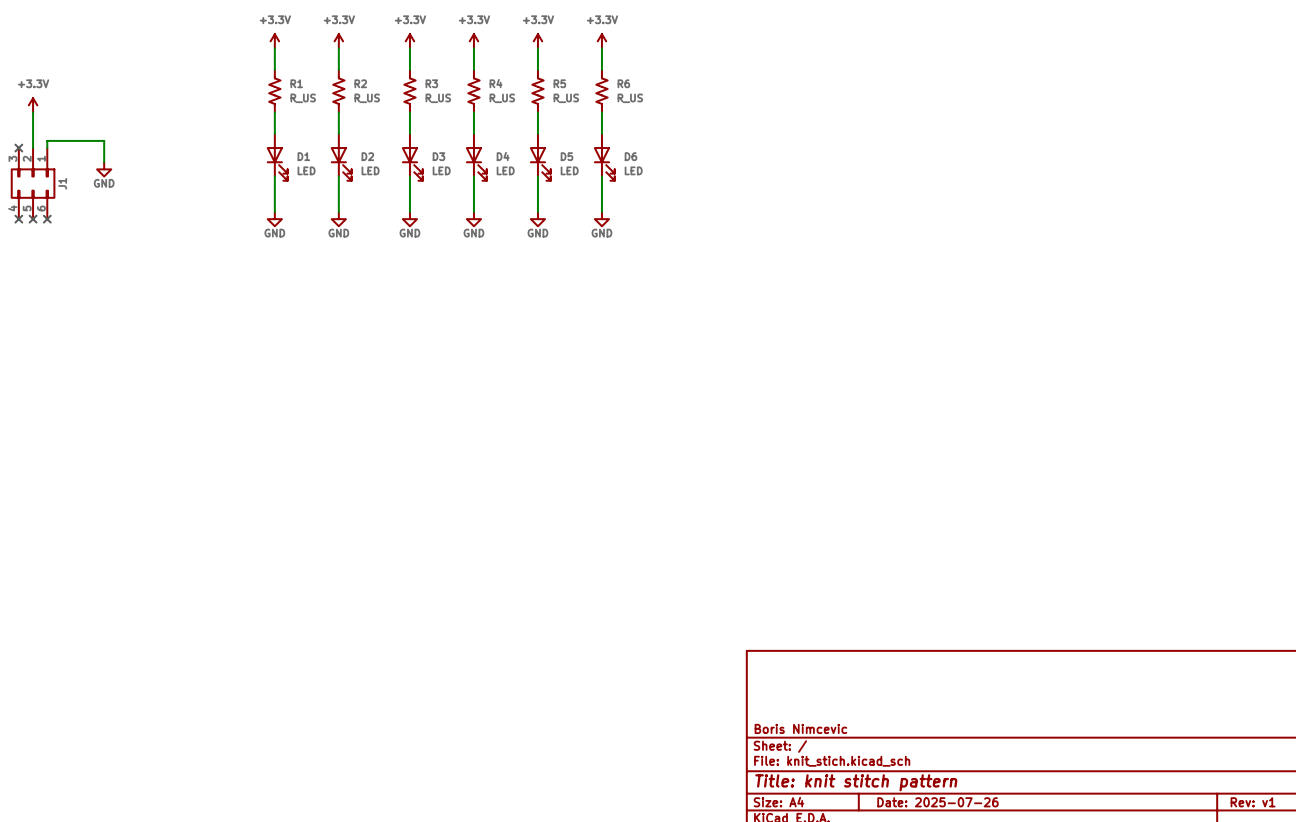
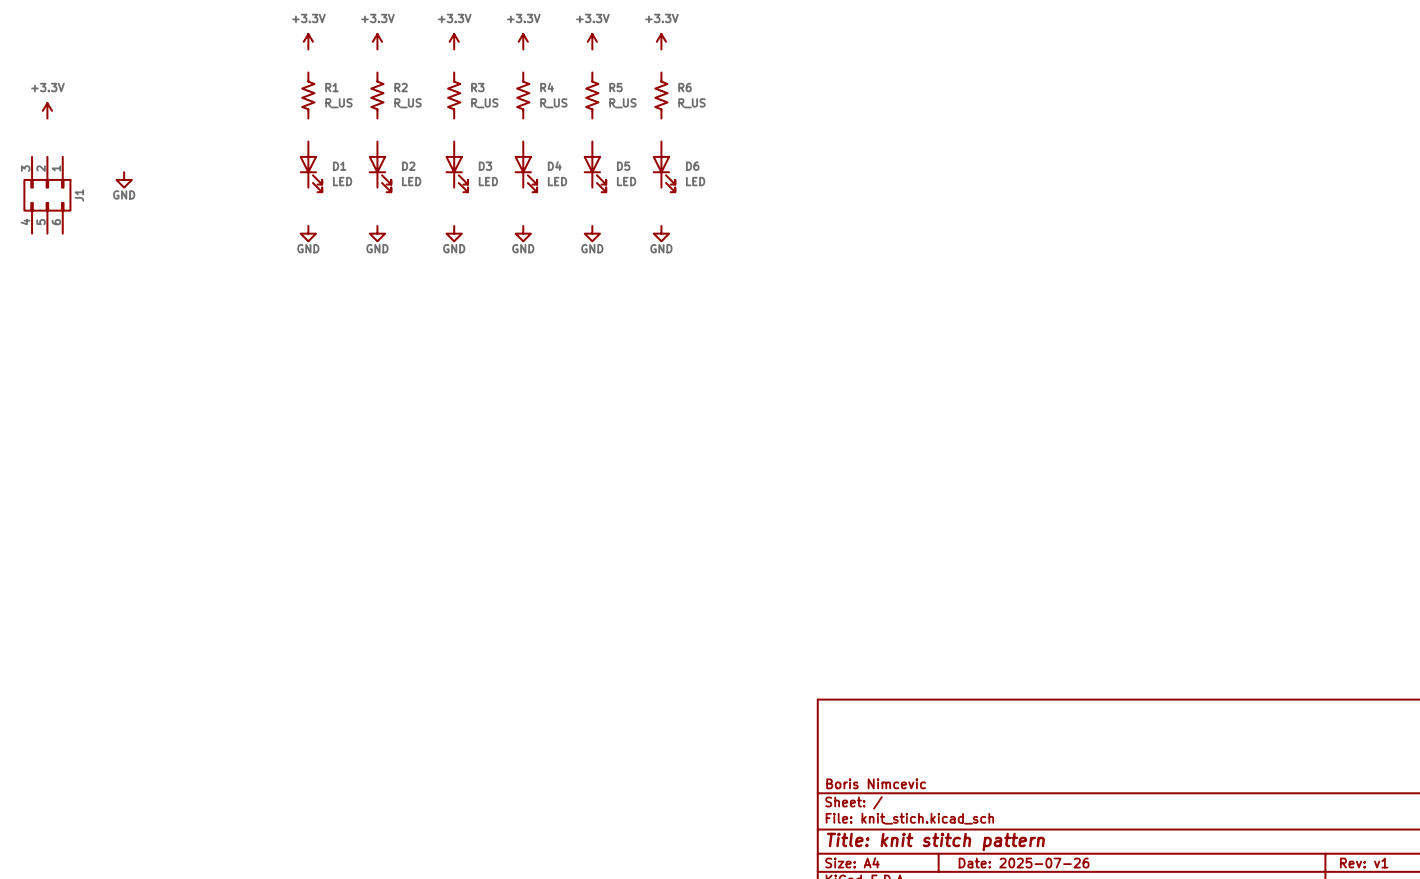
wire: (274, 48) (274, 69) -> none
wire: (338, 48) (338, 69) -> none
wire: (409, 48) (409, 69) -> none
wire: (473, 48) (473, 69) -> none
wire: (537, 48) (537, 69) -> none
wire: (601, 48) (601, 69) -> none
wire: (33, 112) (33, 148) -> none
wire: (274, 112) (274, 133) -> none
wire: (338, 112) (338, 133) -> none
wire: (409, 112) (409, 133) -> none
wire: (473, 112) (473, 133) -> none
wire: (537, 112) (537, 133) -> none
wire: (601, 112) (601, 133) -> none
no-connect mark: (18, 148) -> none
wire: (47, 148) (47, 140) (104, 140) (104, 162) -> none
wire: (274, 176) (274, 212) -> none
wire: (338, 176) (338, 212) -> none
wire: (409, 176) (409, 212) -> none
wire: (473, 176) (473, 212) -> none
wire: (537, 176) (537, 212) -> none
wire: (601, 176) (601, 212) -> none
no-connect mark: (18, 219) -> none
no-connect mark: (33, 219) -> none
no-connect mark: (47, 219) -> none

